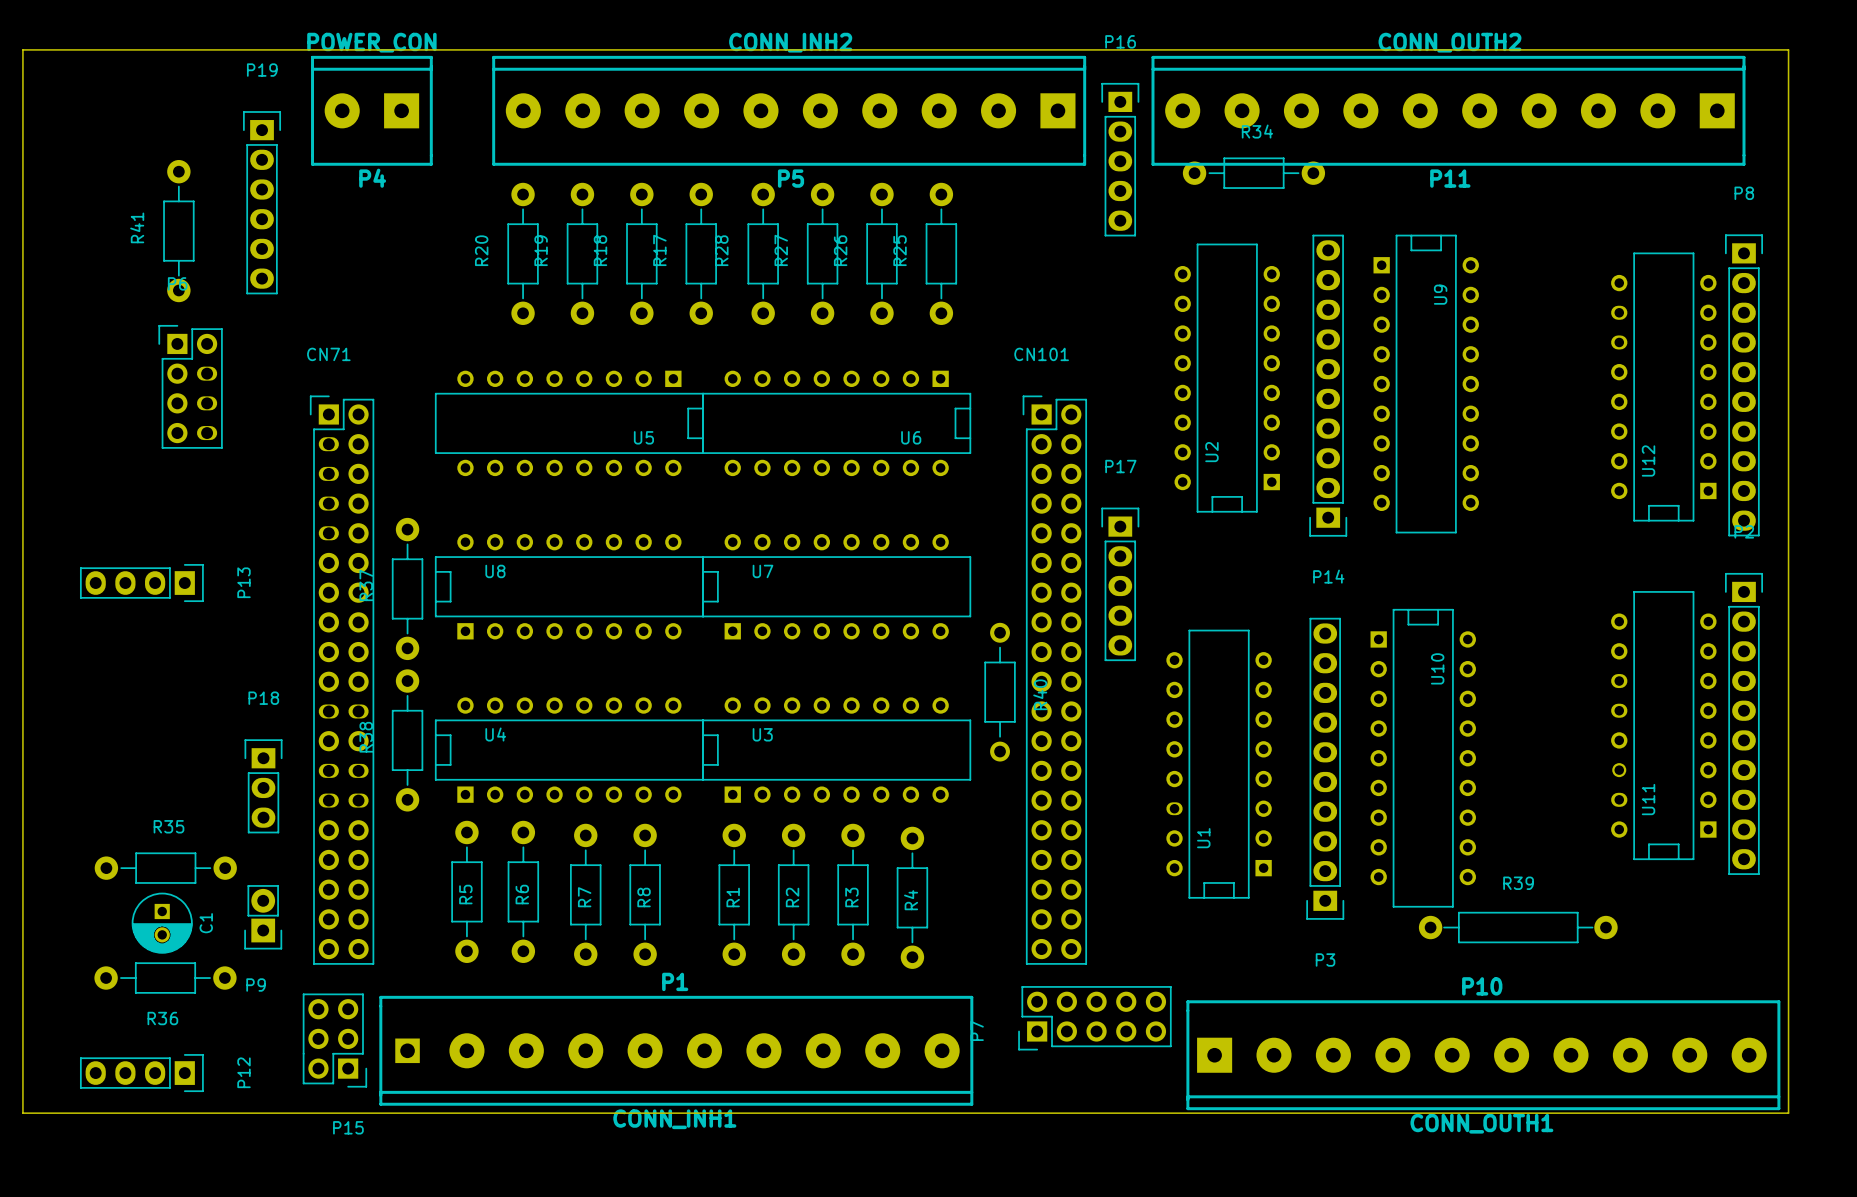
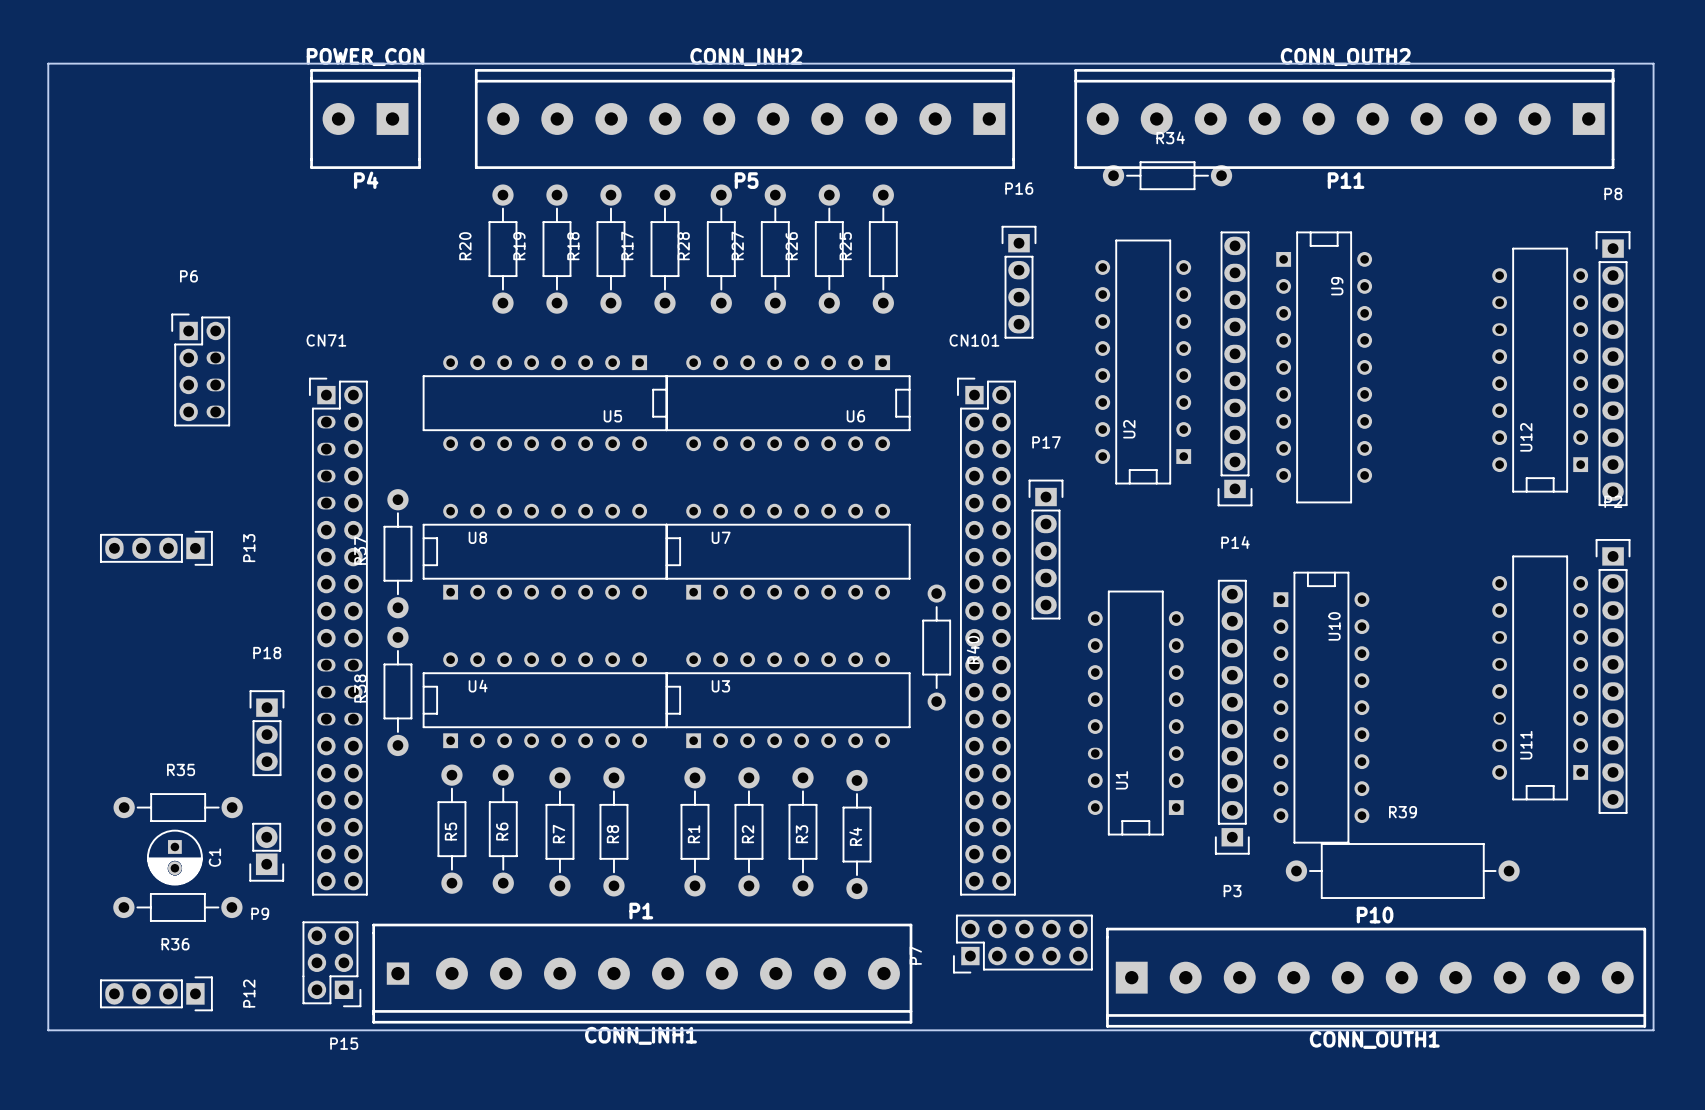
P16 footprint: [1101, 82, 1140, 237] -> [1001, 225, 1037, 339]
P19: (262, 202) -> none
R41: (178, 231) -> none
CN71 footprint: [309, 395, 375, 965] -> [309, 377, 368, 896]
R39 footprint: [1418, 911, 1618, 944] -> [1285, 843, 1520, 899]

